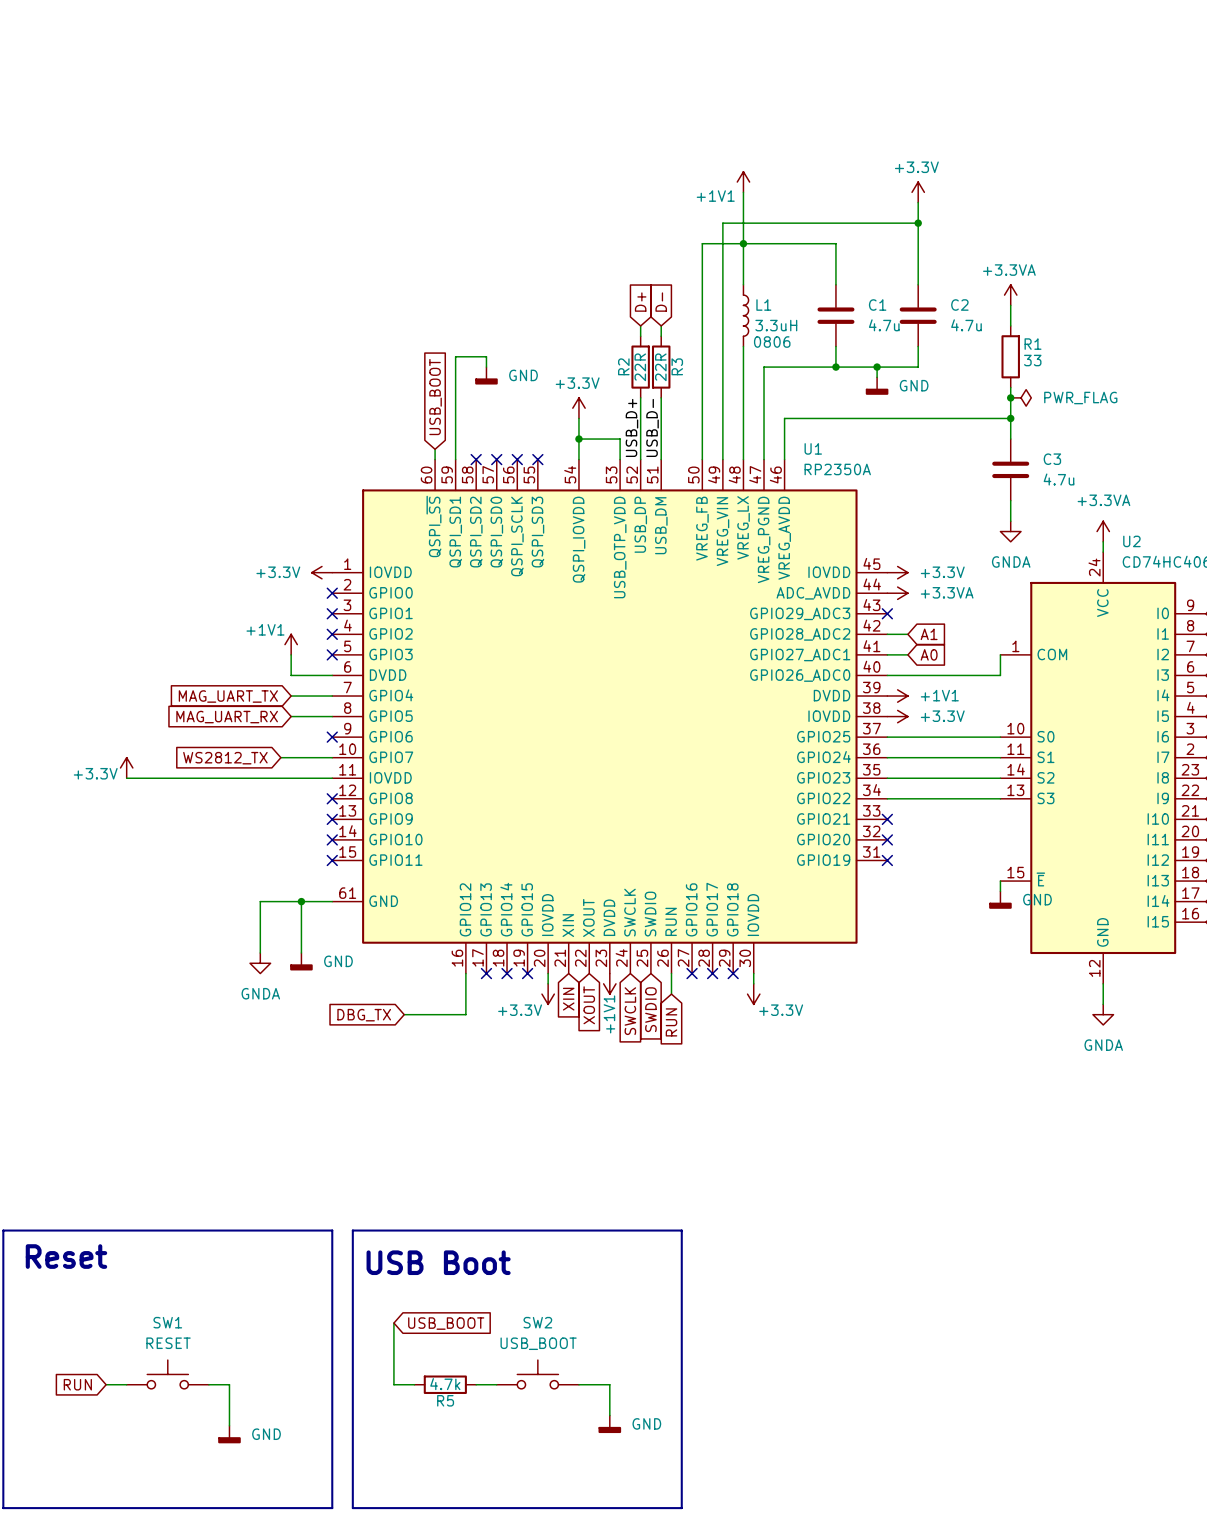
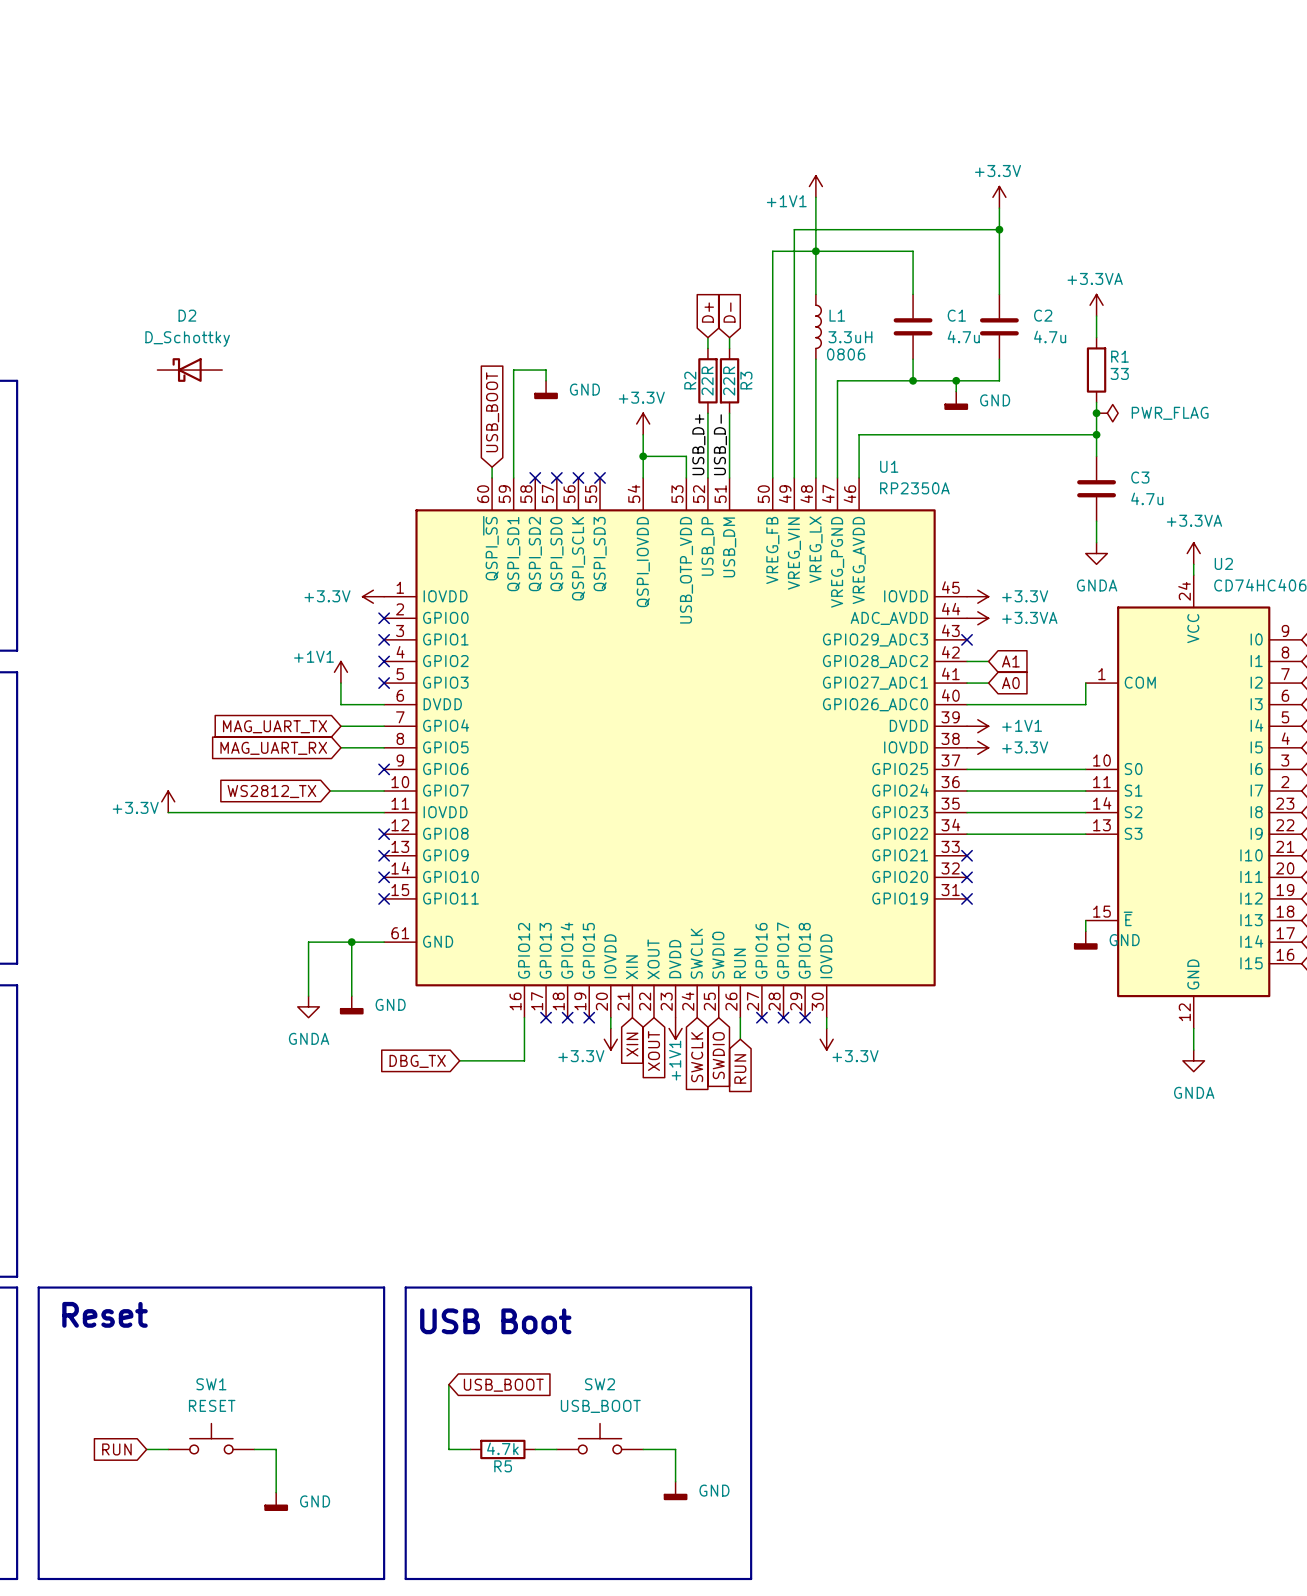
D2: none -> D_Schottky (189, 370)

